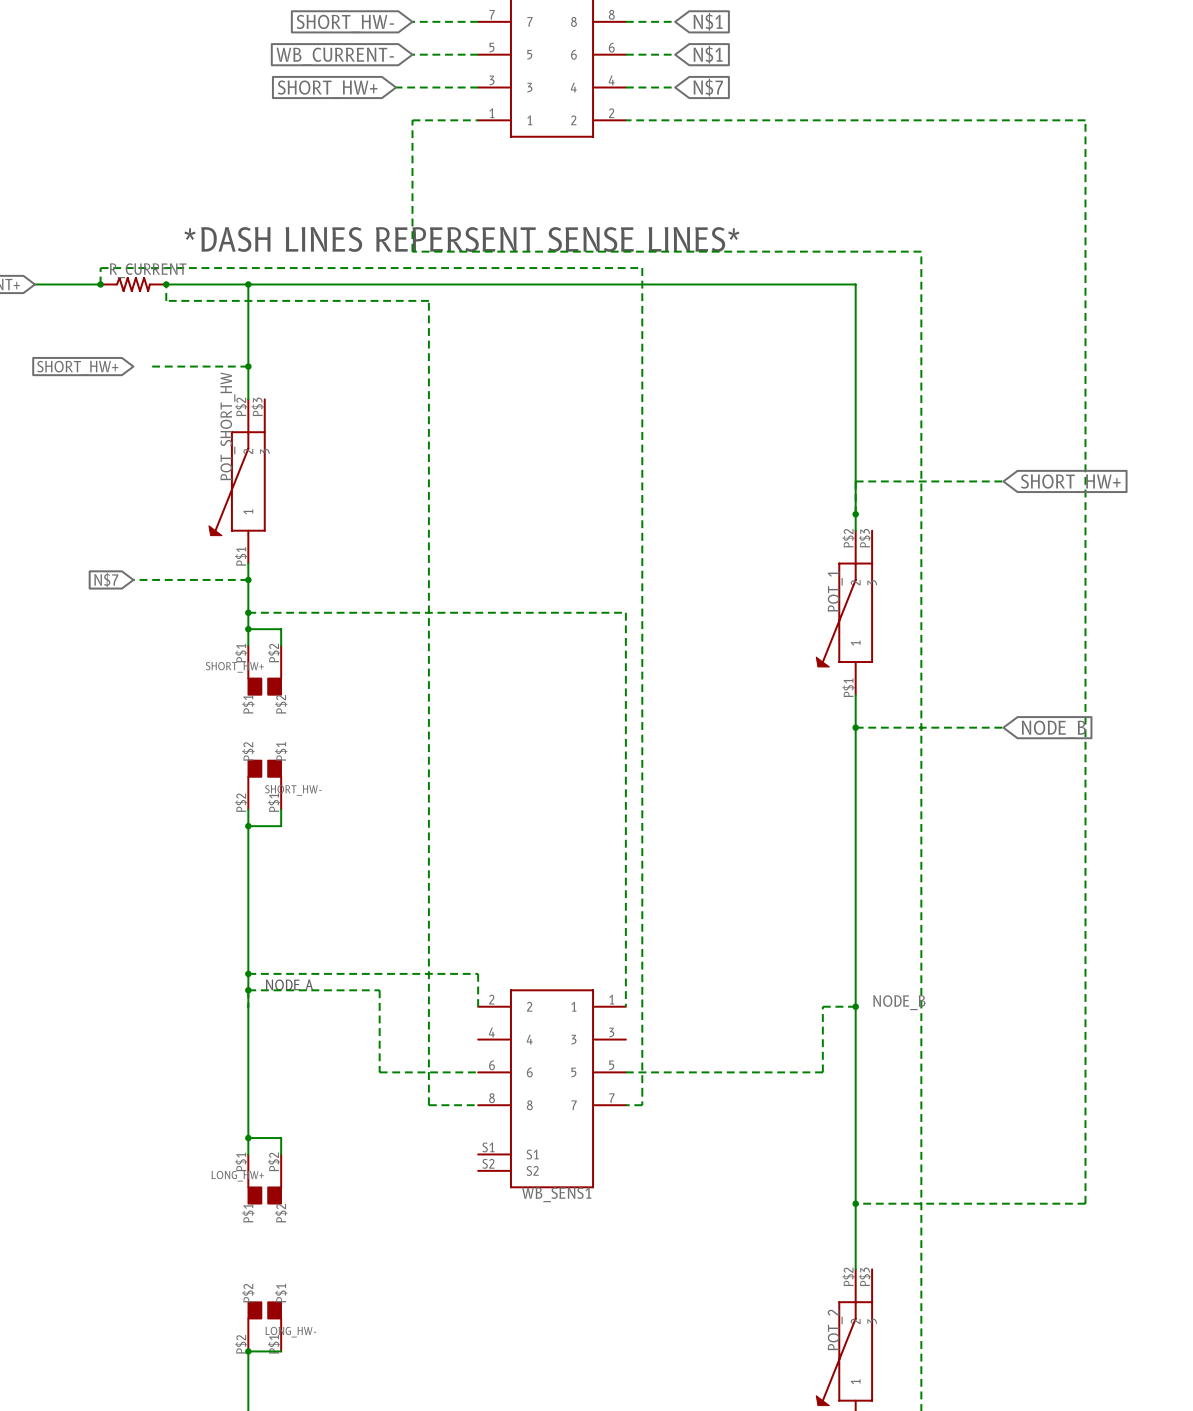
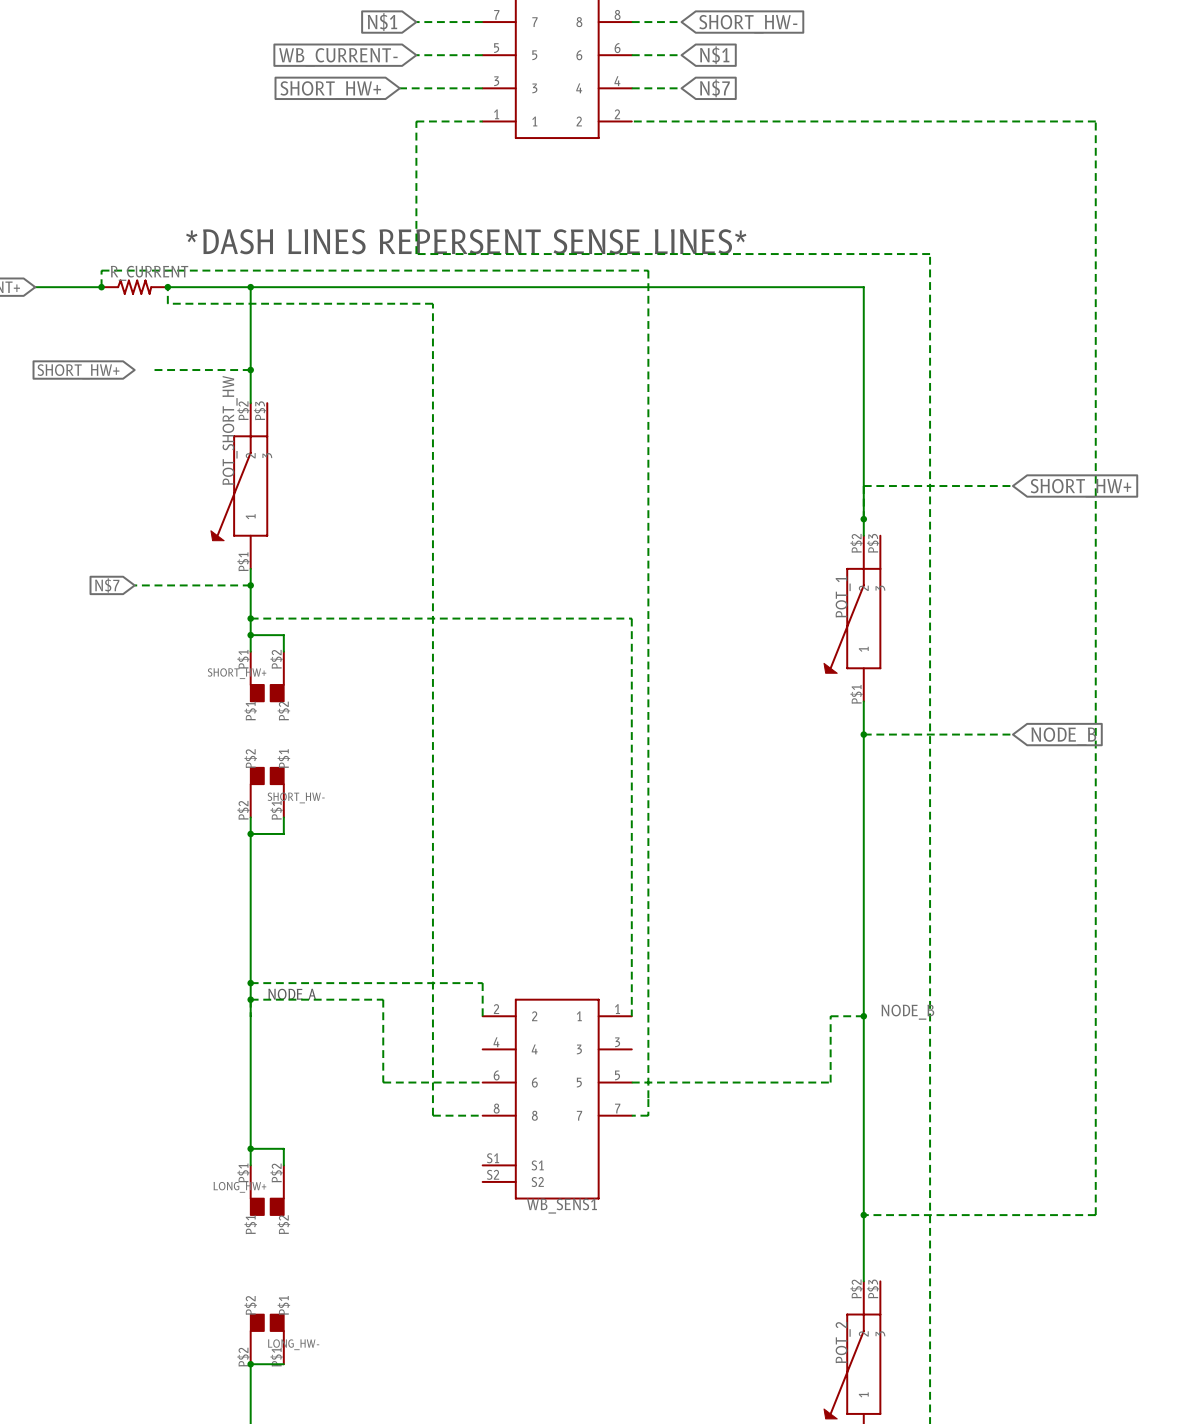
global label: N$1 (708, 21) -> SHORT_HW- (748, 24)
global label: SHORT_HW- (345, 23) -> N$1 (382, 22)

